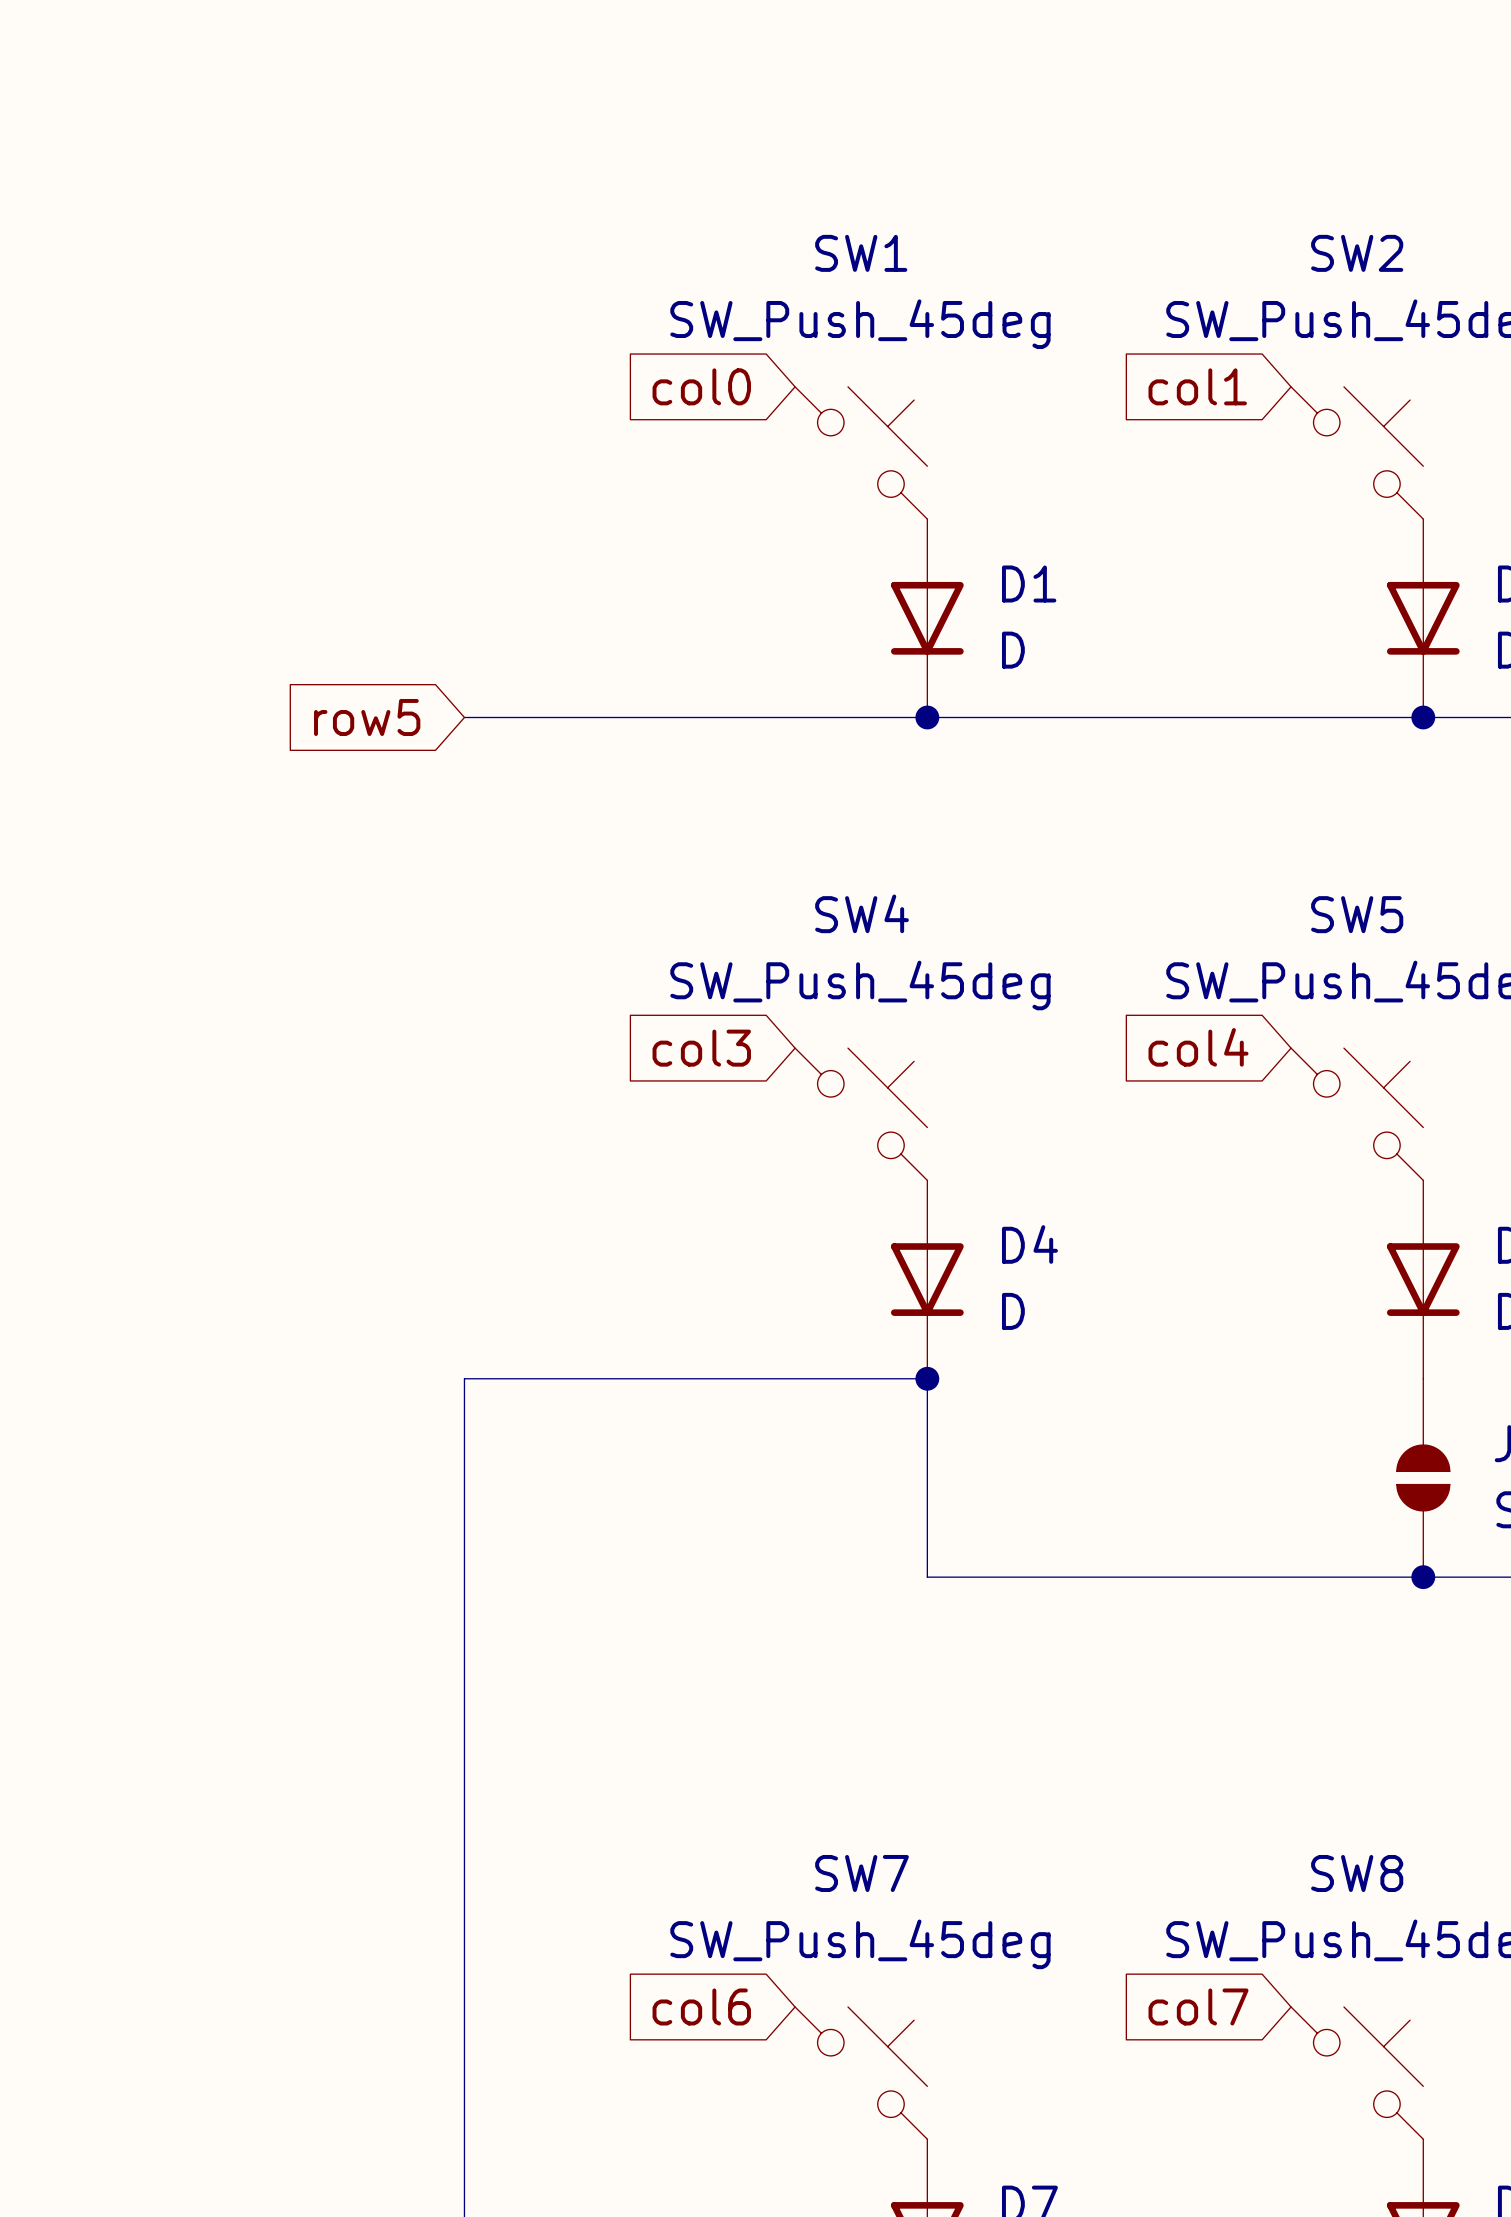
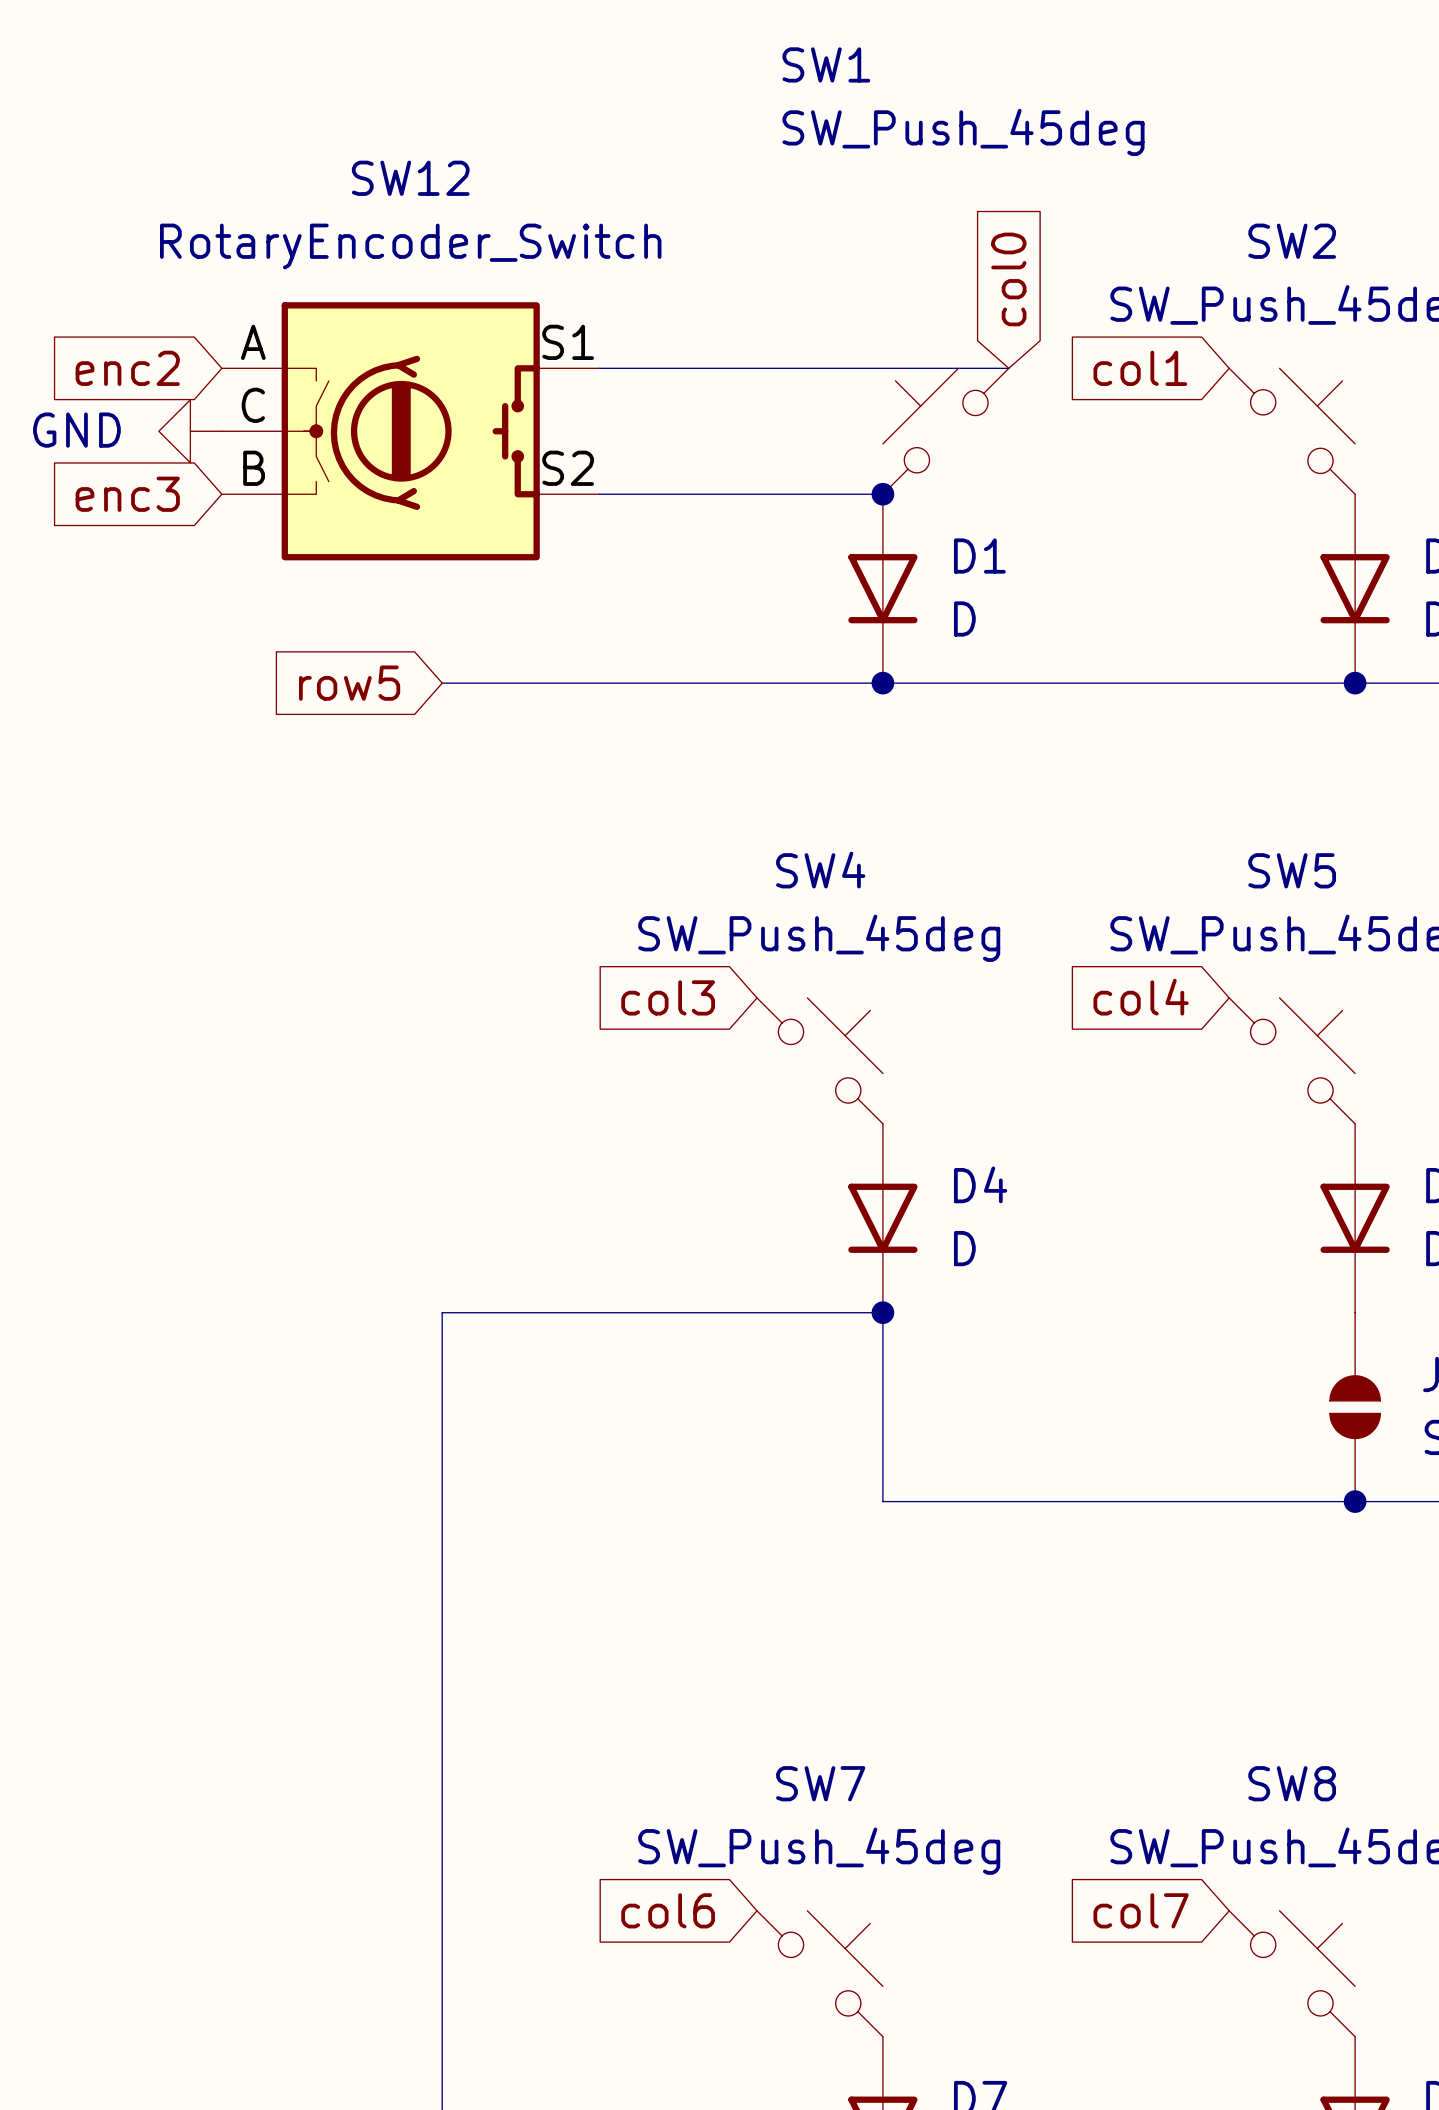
SW1 name position: SW1 (861, 253) -> SW1 (826, 64)
SW1 value position: SW_Push_45deg (860, 324) -> SW_Push_45deg (963, 132)
global label: none -> enc2 (127, 368)
wire: none -> (599, 368) (1008, 368)
global label rotation: 0° (701, 386) -> 90° clockwise (1008, 279)
global label position: col0 (701, 386) -> col0 (1008, 279)
power symbol: none -> GND (190, 431)
SW12: none -> RotaryEncoder_Switch (410, 431)
SW1 rotation: 0° (861, 452) -> 90° counterclockwise (945, 431)
SW1 position: (861, 452) -> (945, 431)
global label: none -> enc3 (127, 494)
wire: none -> (599, 494) (882, 494)
junction: none -> (882, 494)

